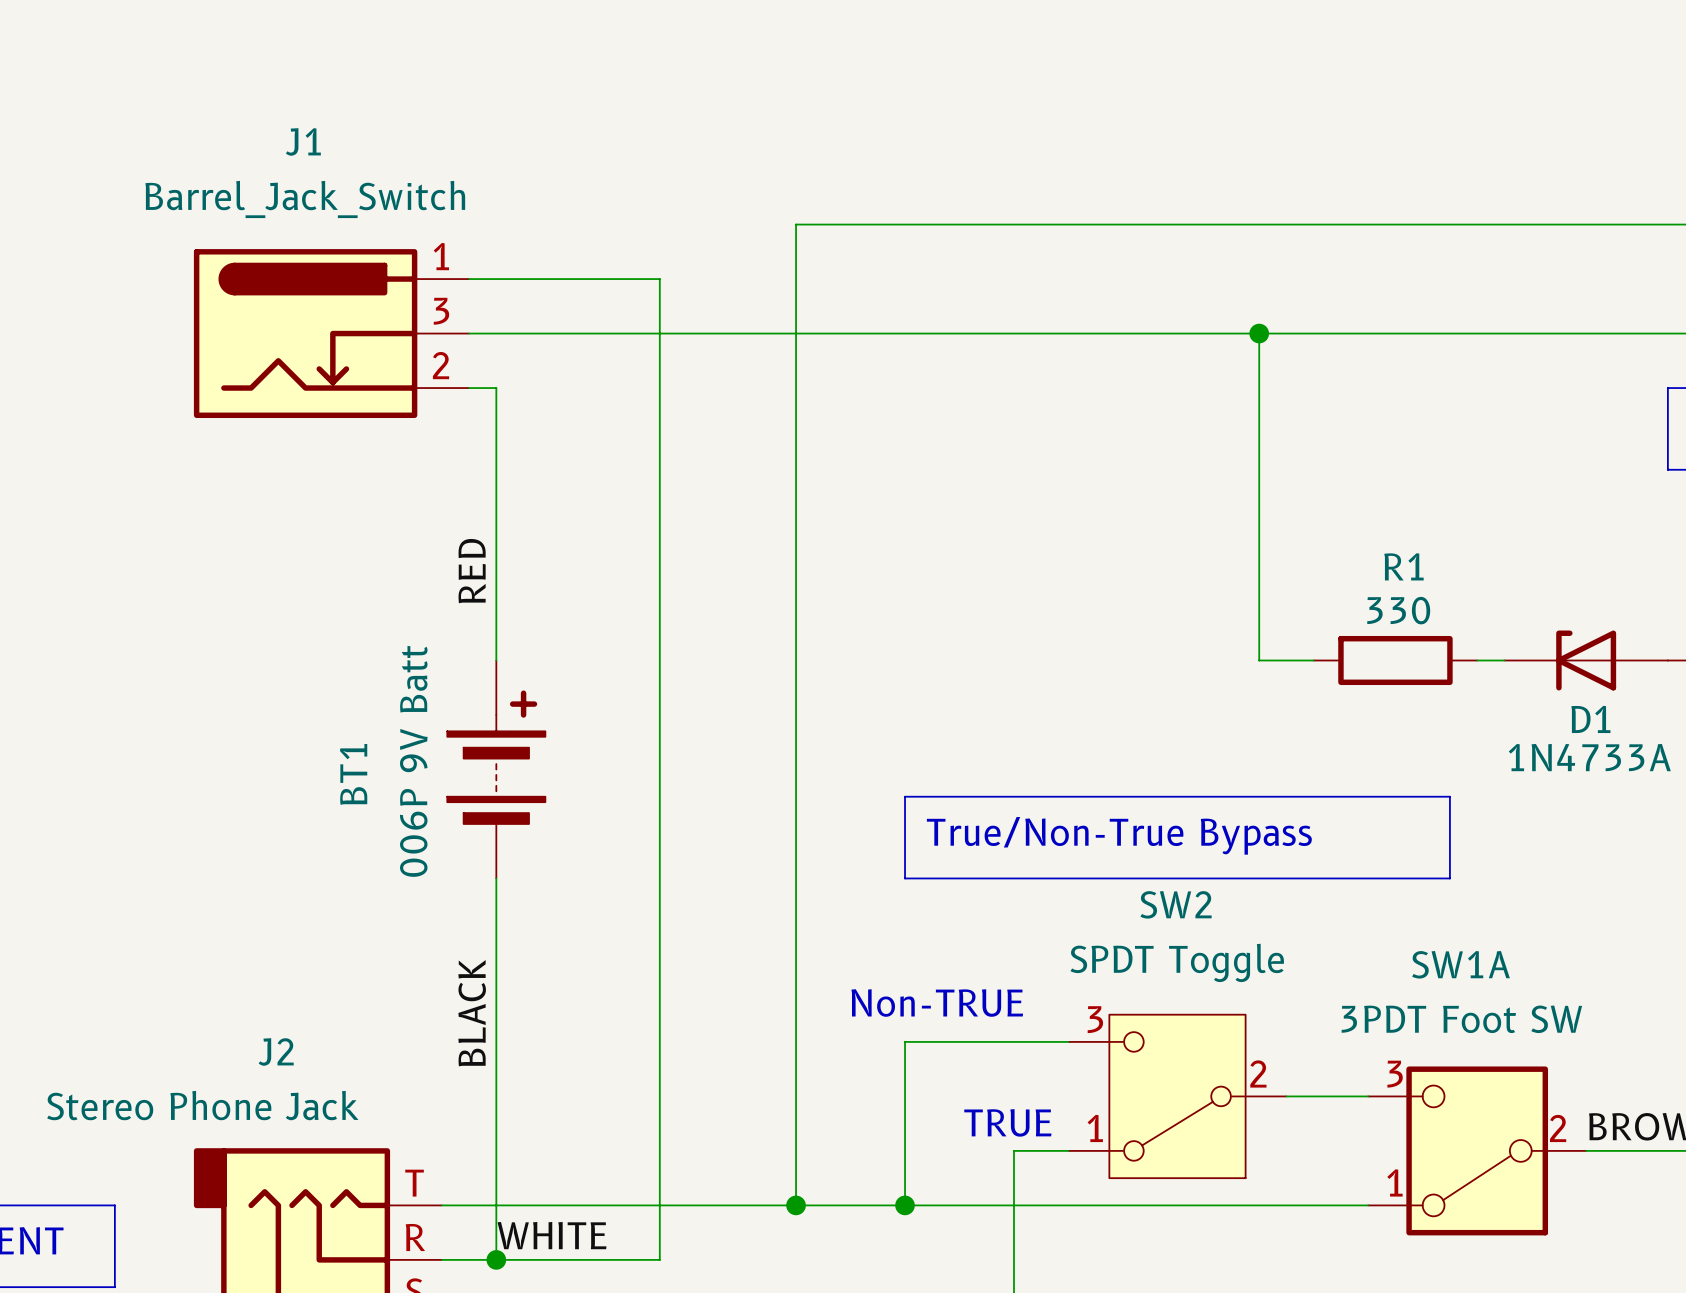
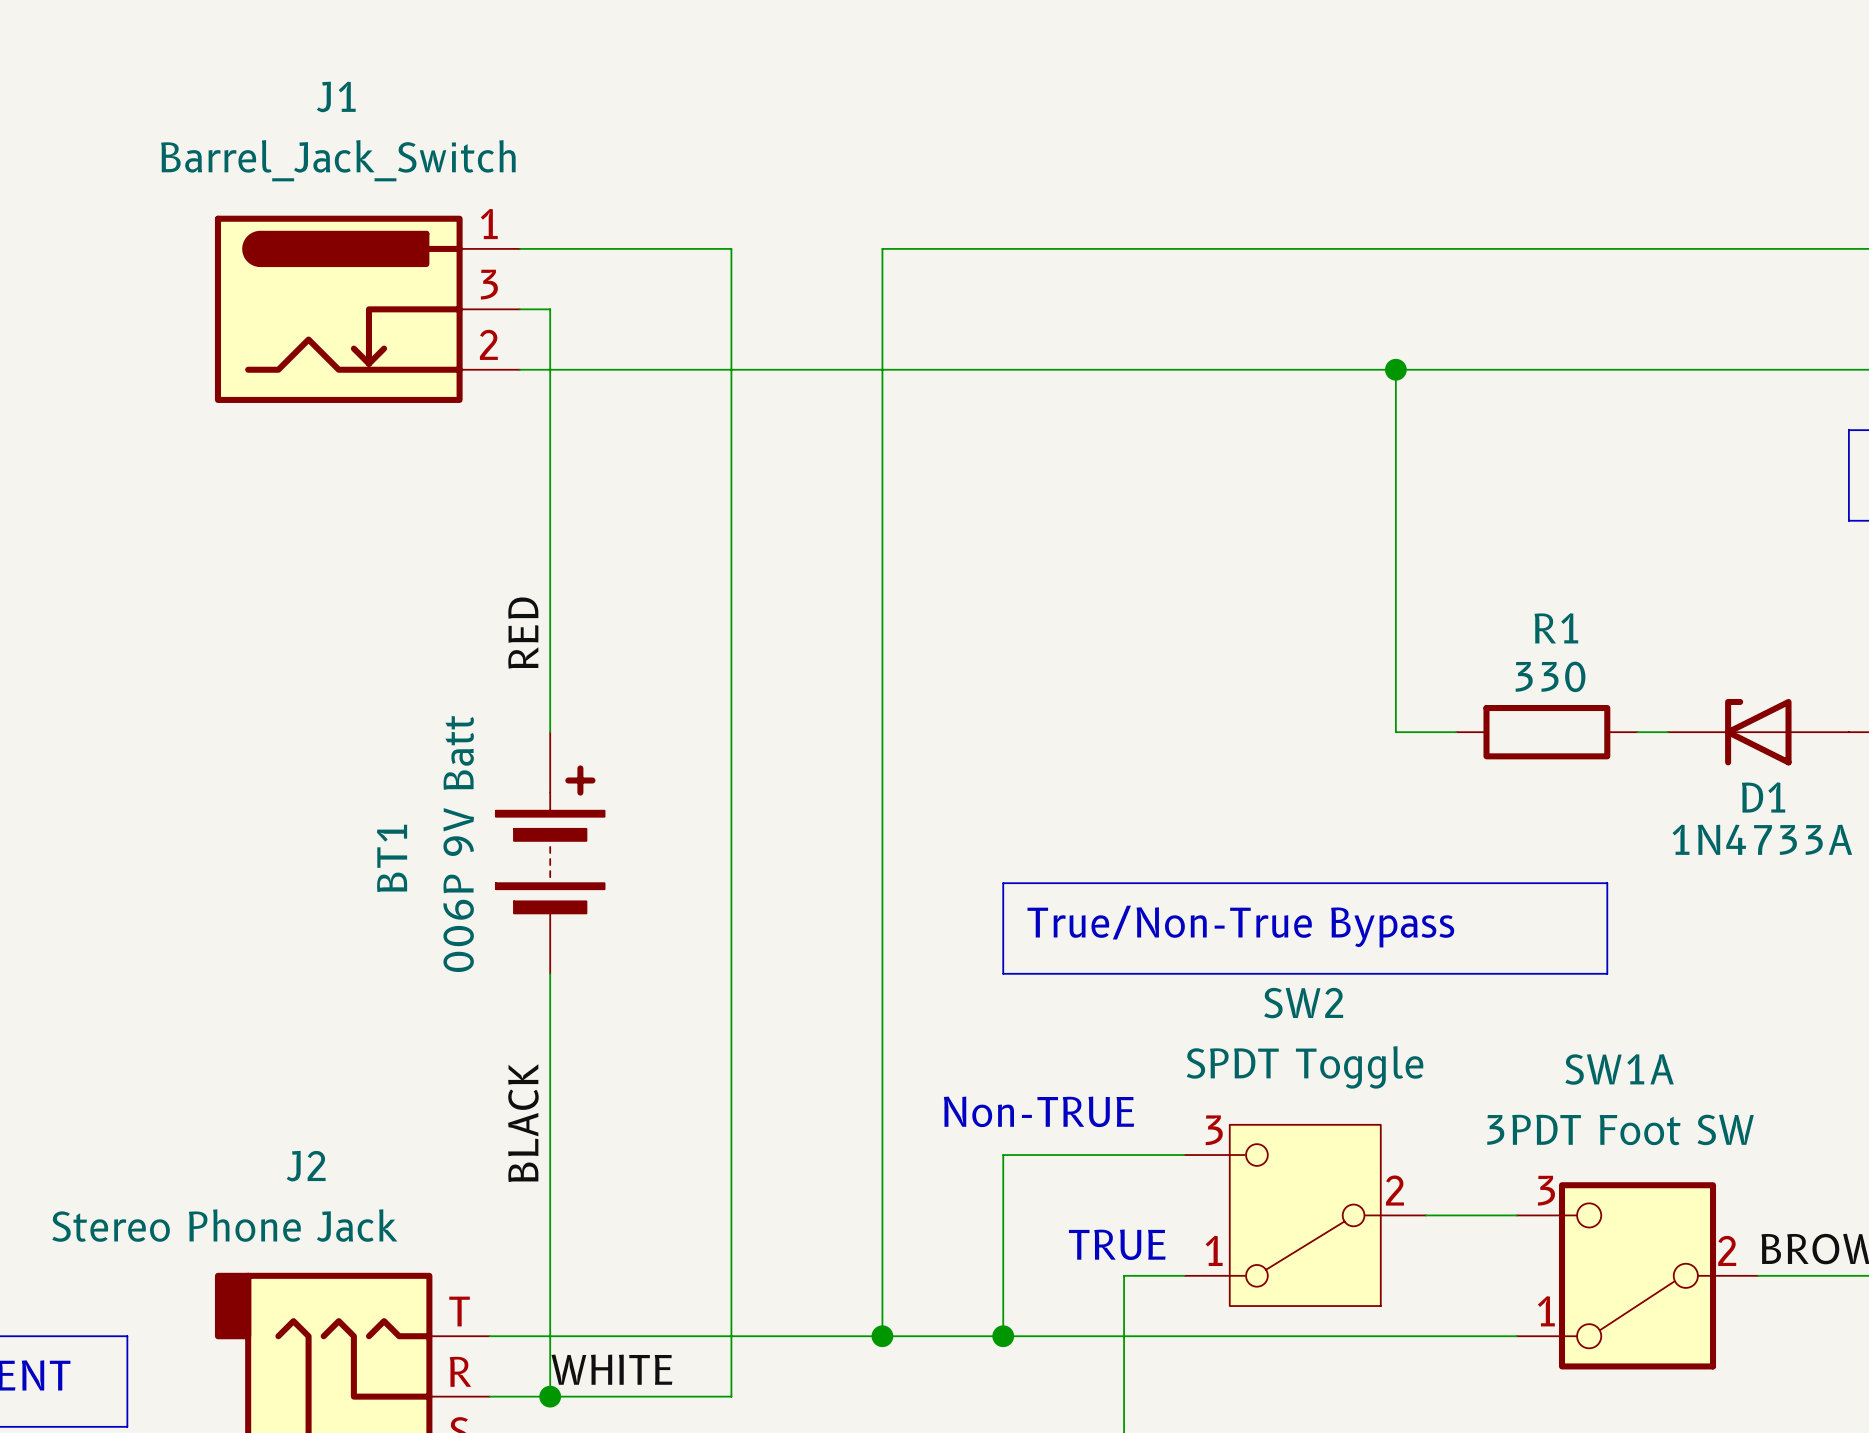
wire: (496, 279) (659, 279) -> (519, 248) (731, 248) (731, 309)
J1 position: (331, 333) -> (367, 309)
wire: (469, 388) (496, 388) -> (550, 309) (550, 430)

